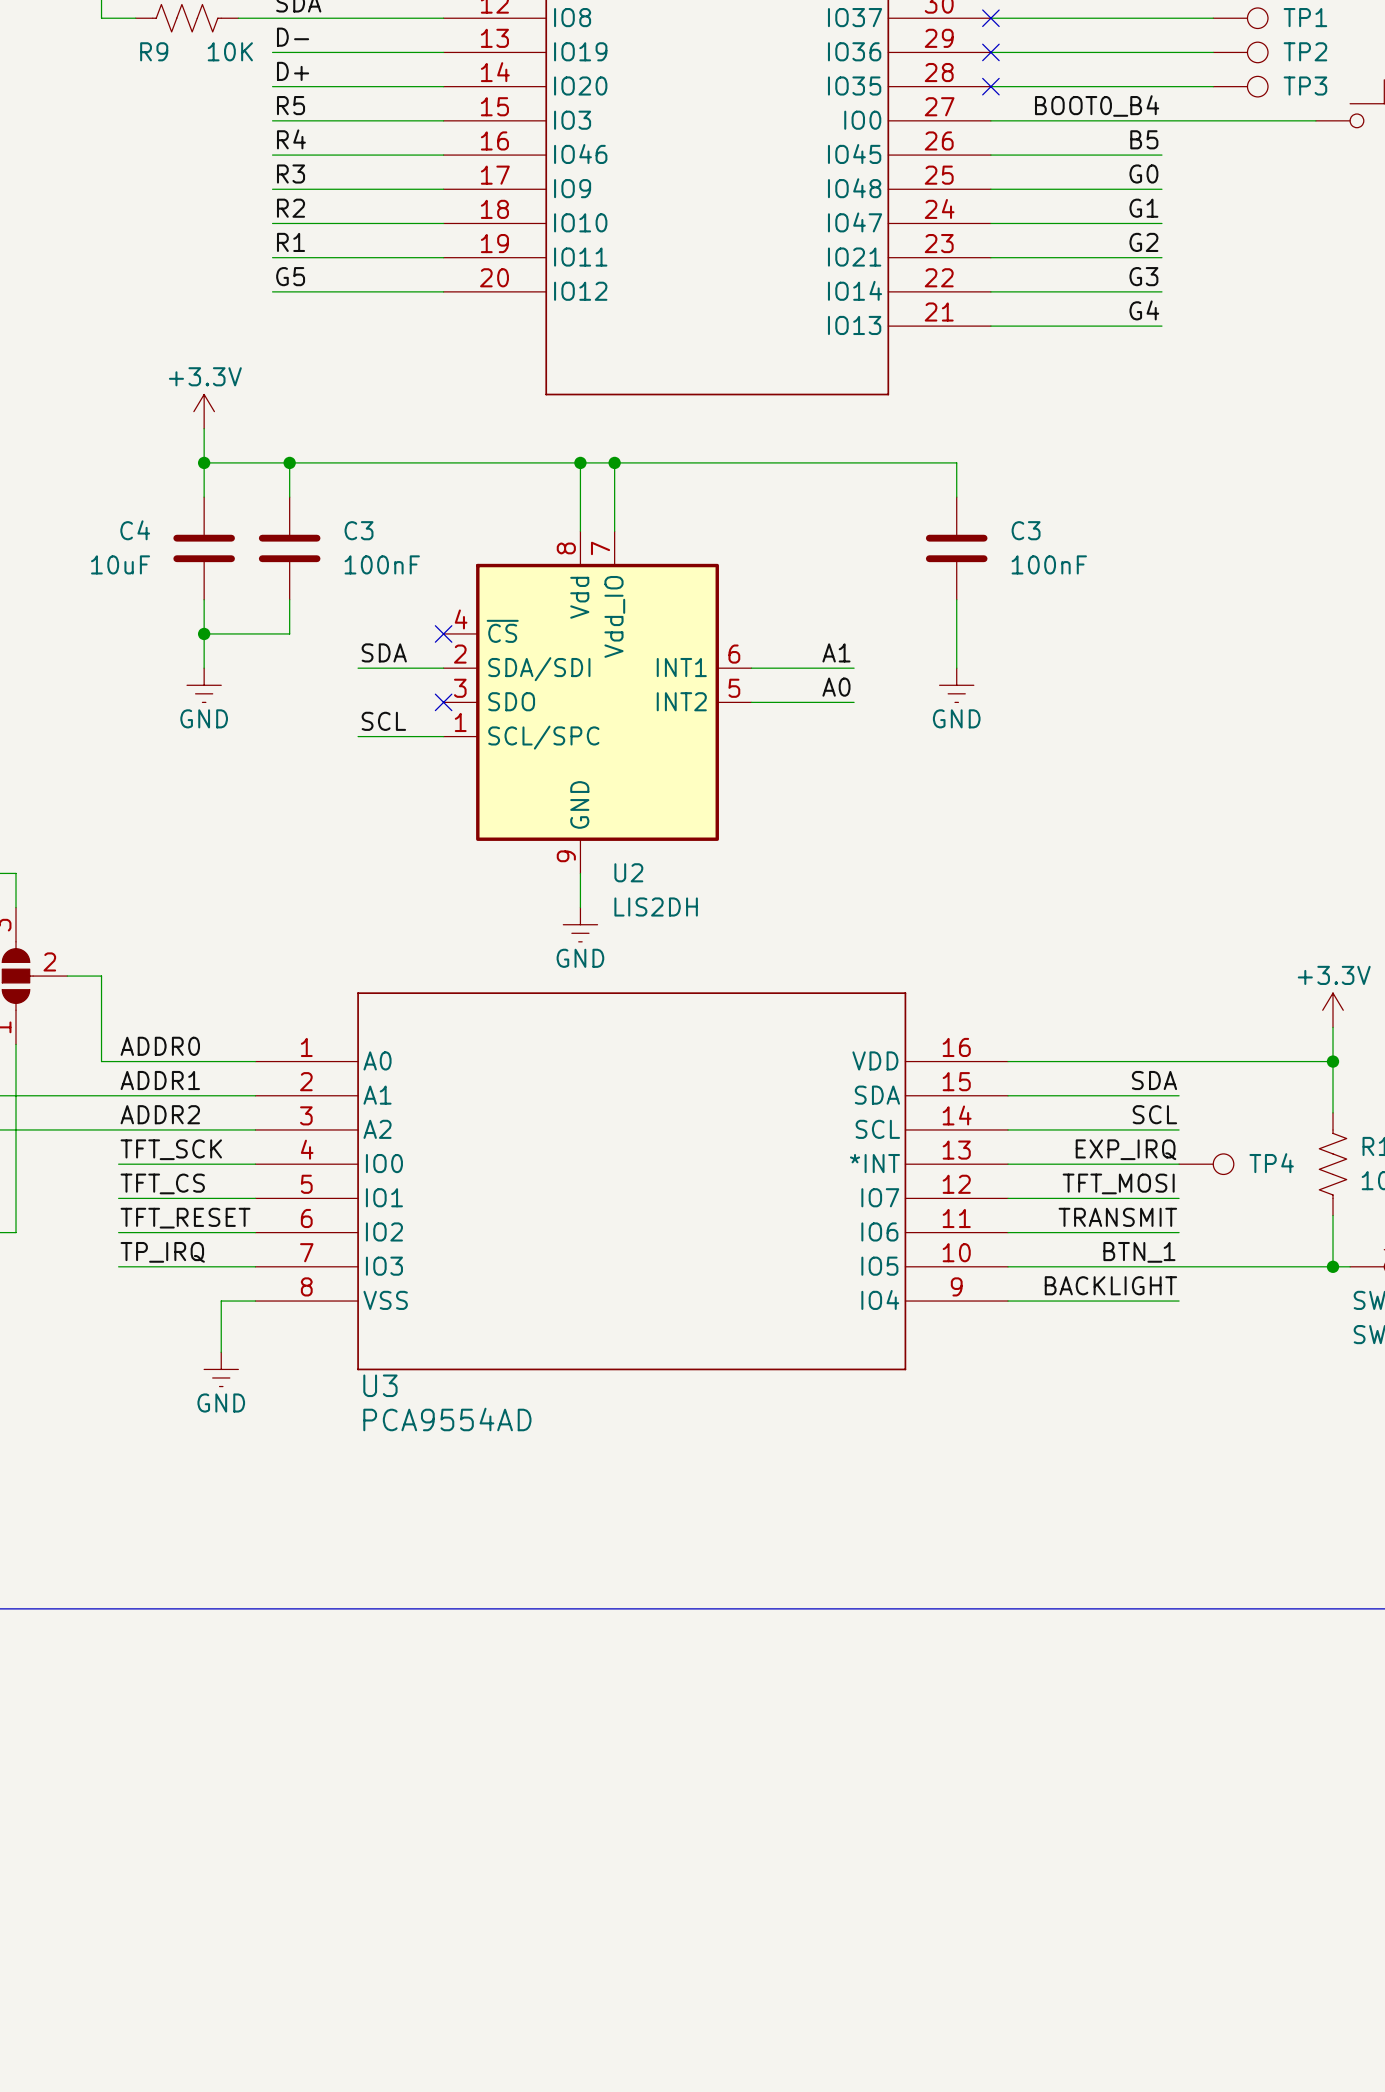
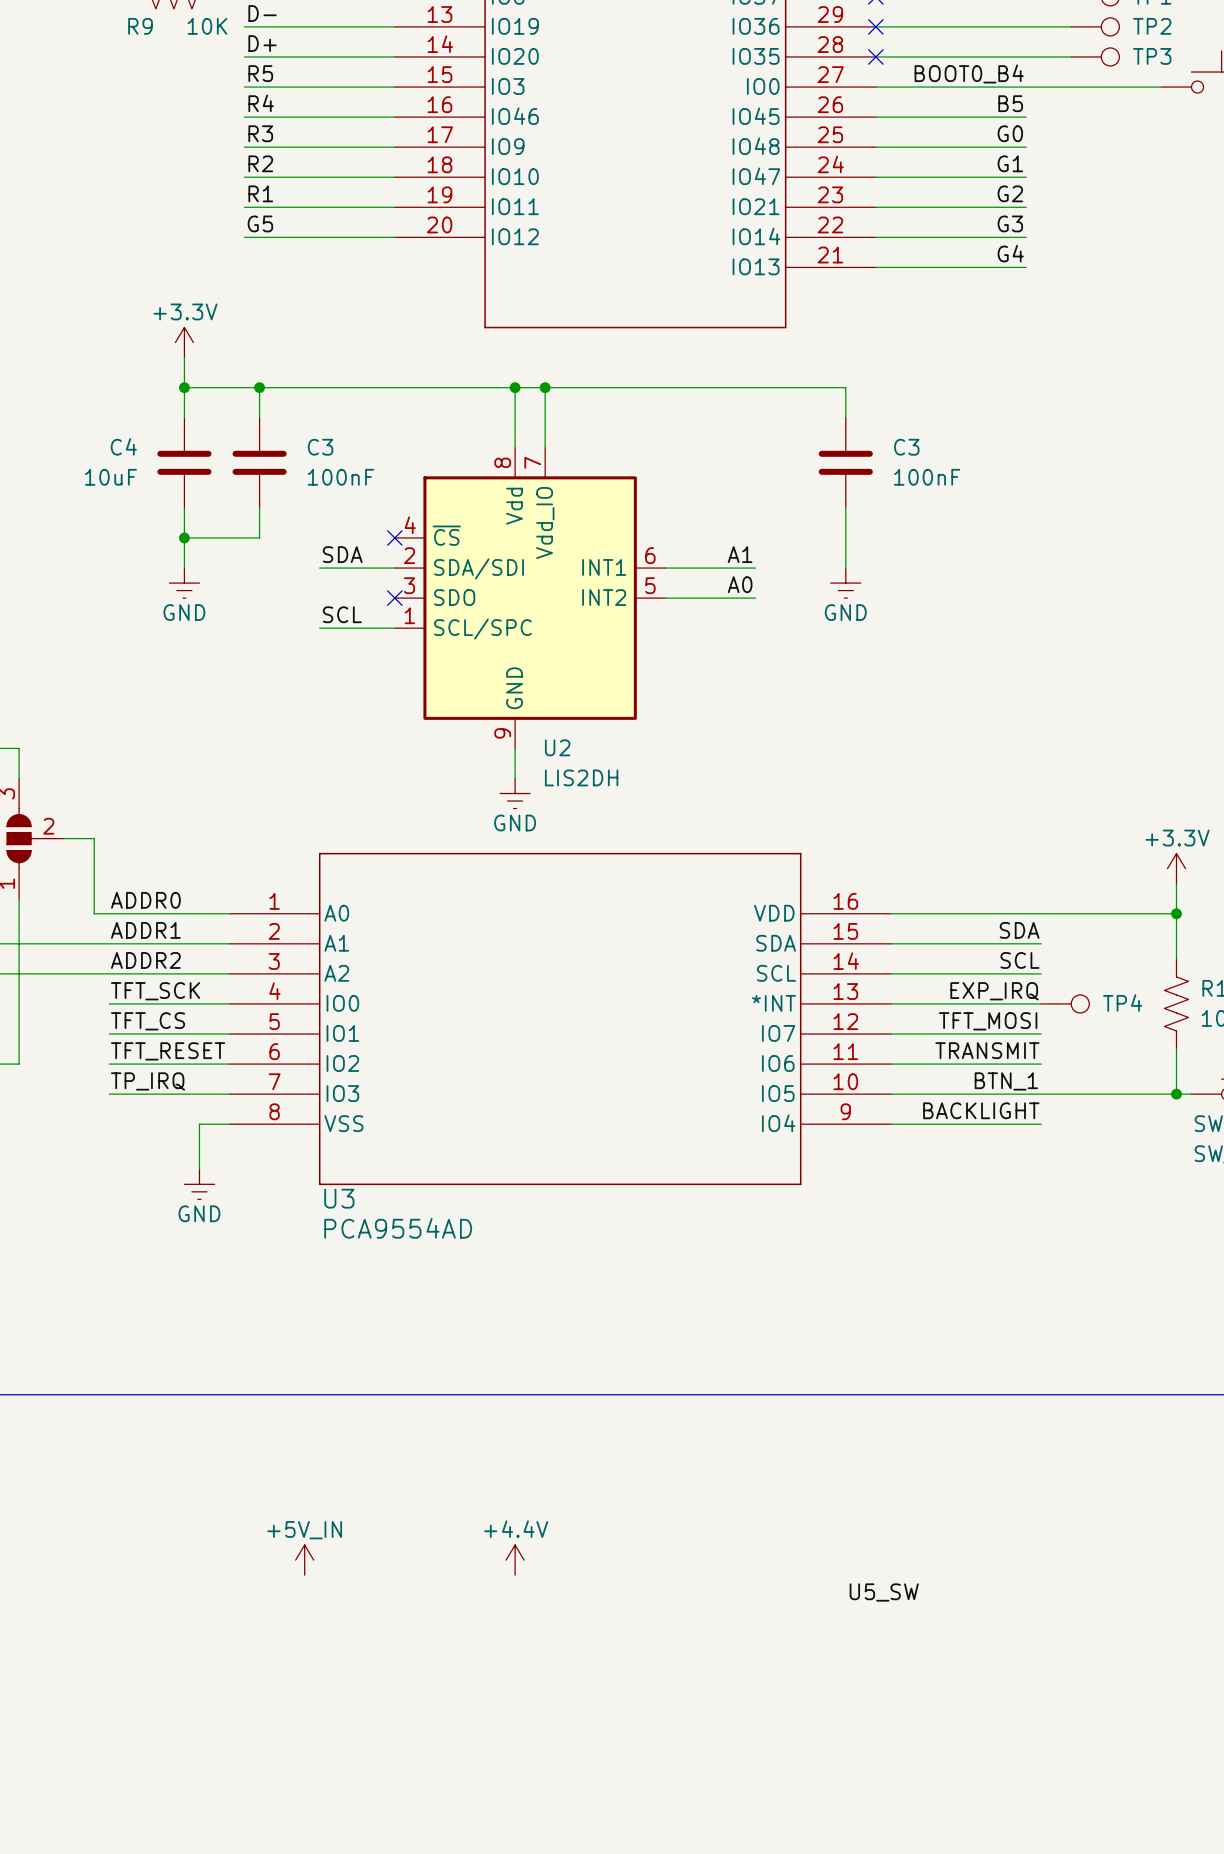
power symbol: none -> +5V_IN (304, 1560)
power symbol: none -> +4.4V (515, 1560)
label: none -> U5_SW (884, 1592)

